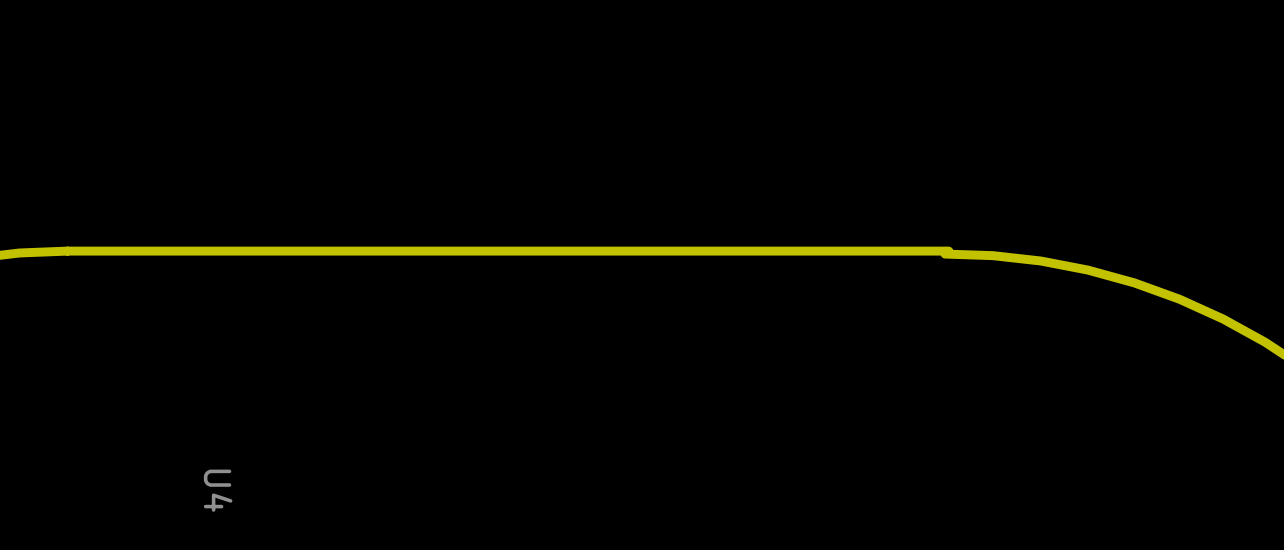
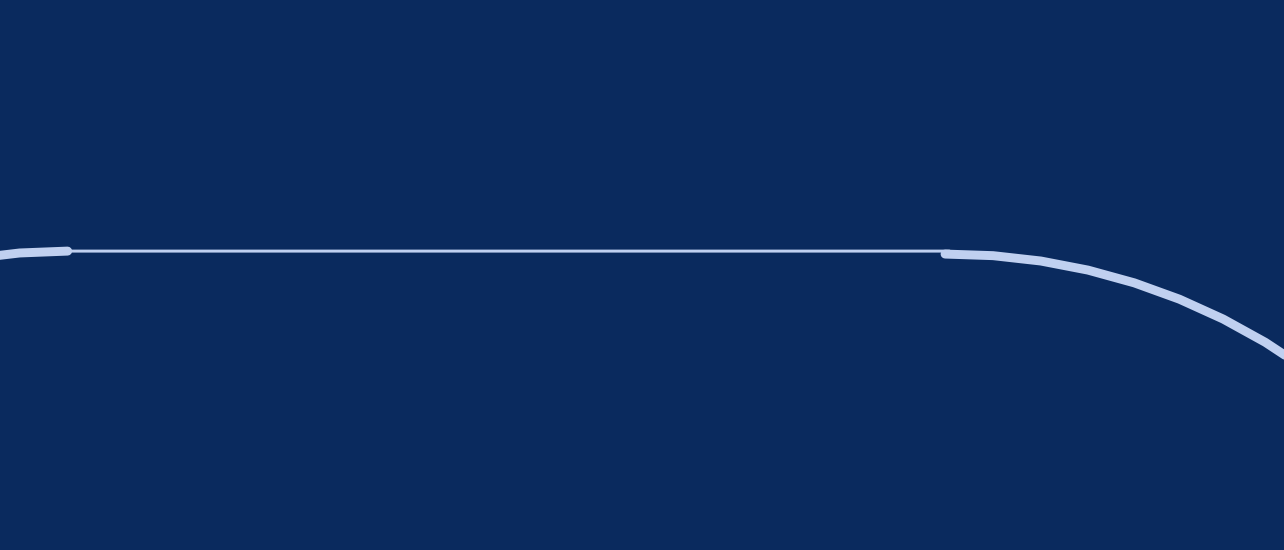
board edge width: thick (948, 251) (67, 251) -> thin (948, 251) (67, 251)
U4: (218, 490) -> none

